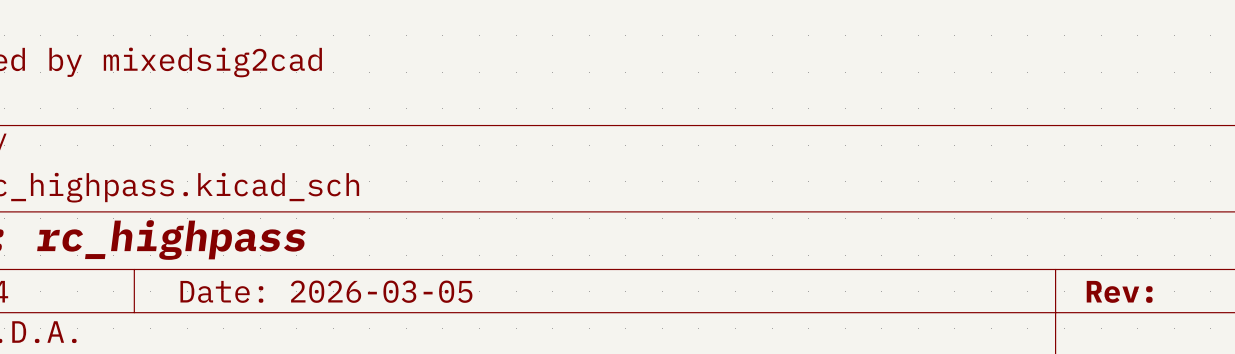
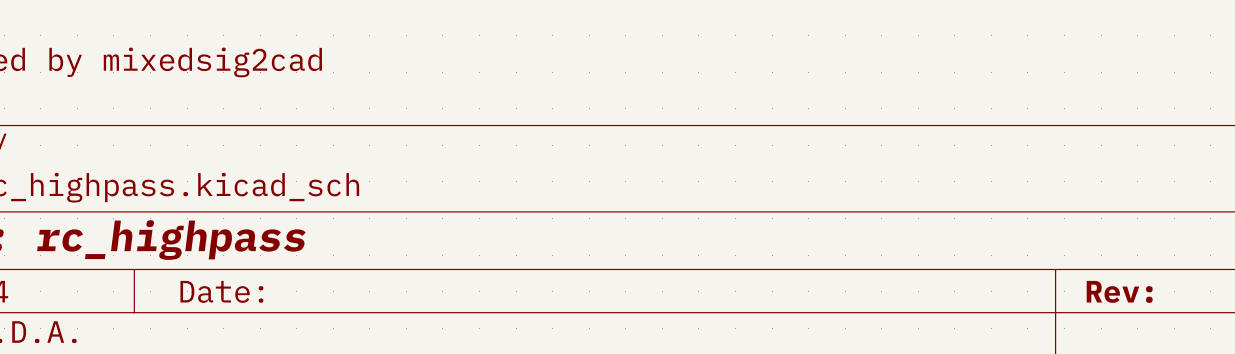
title block: Date: 2026-03-05 (326, 291) -> Date: (221, 291)

